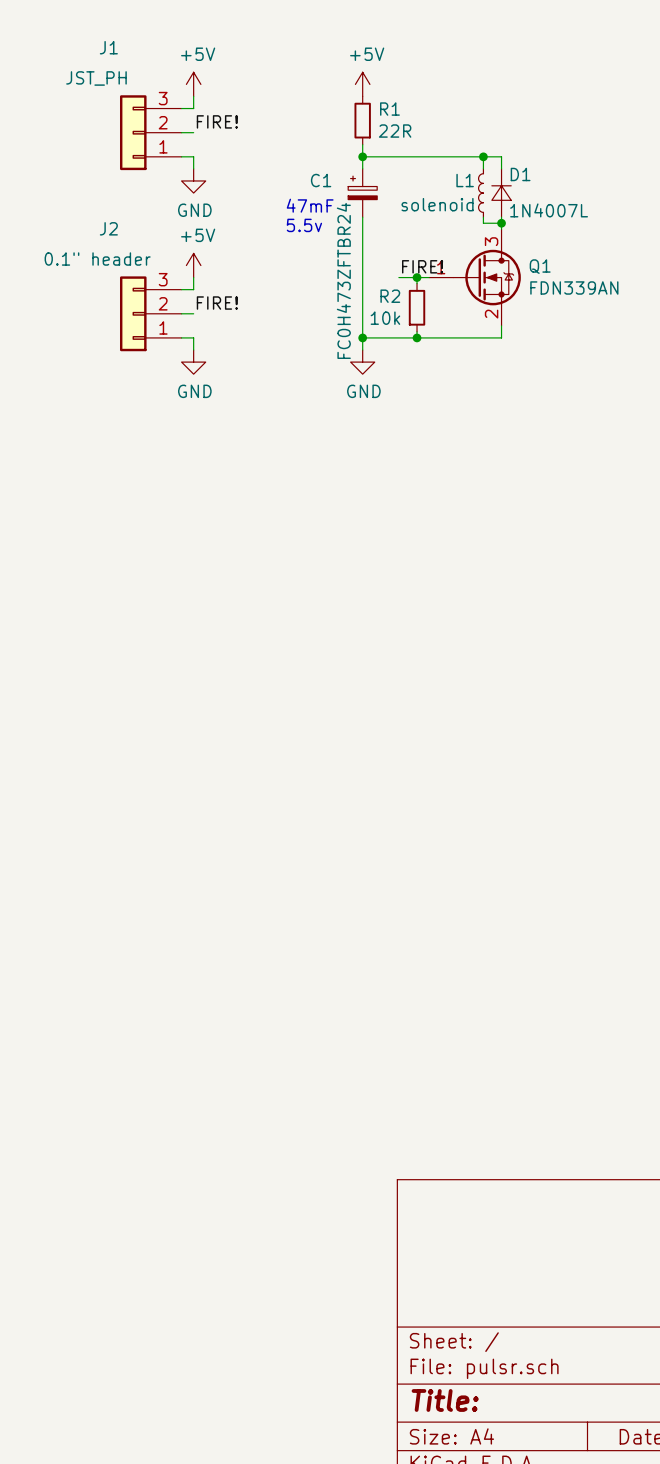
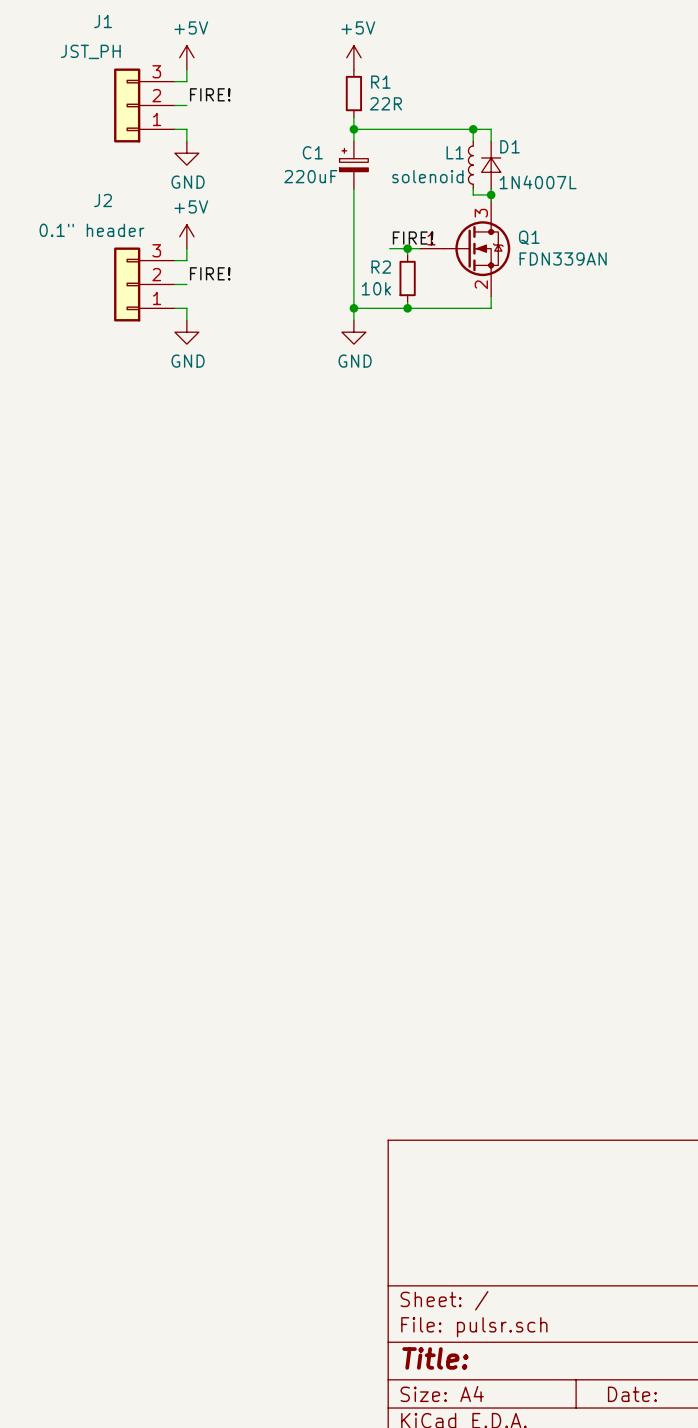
text: 47mF (310, 205) -> none
text: 5.5v (304, 225) -> none
C1 value: FC0H473ZFTBR24 (343, 280) -> 220uF (310, 176)

